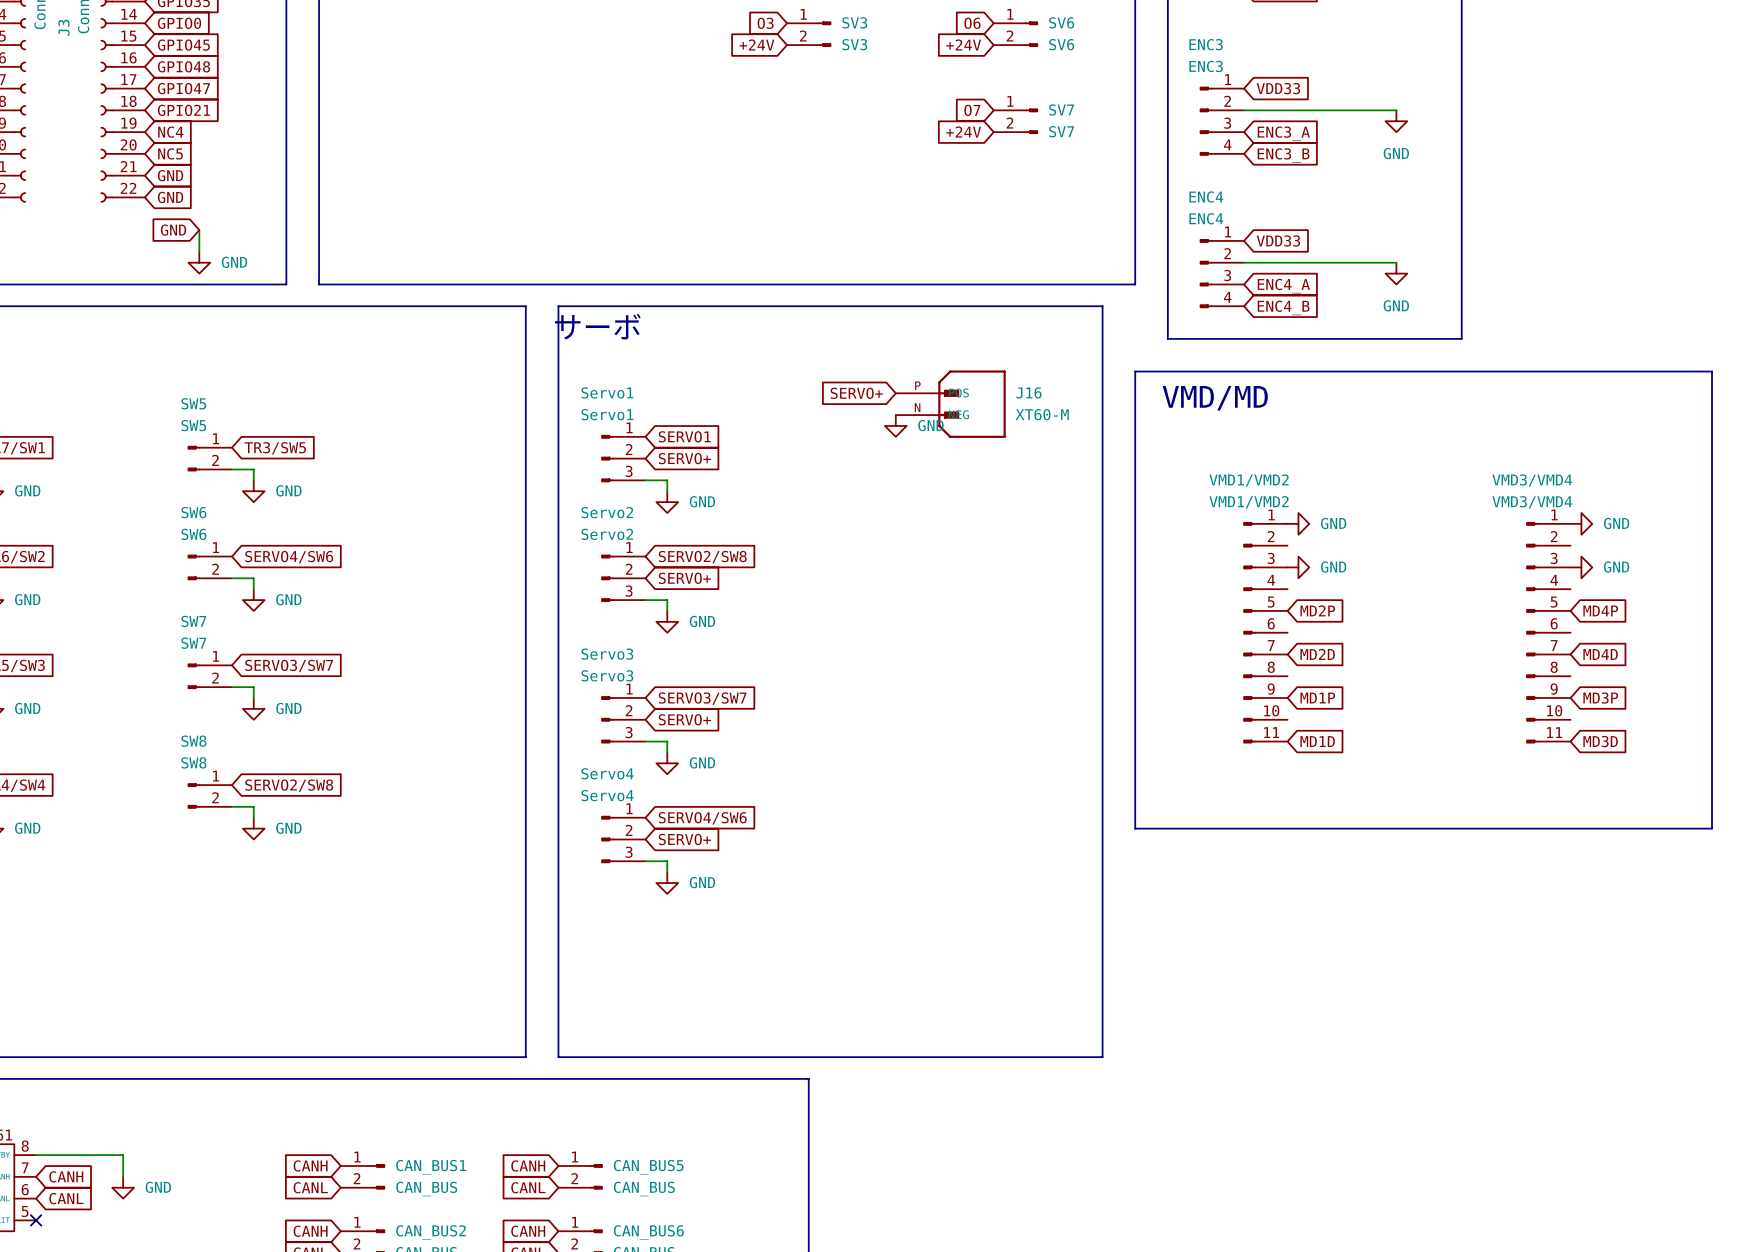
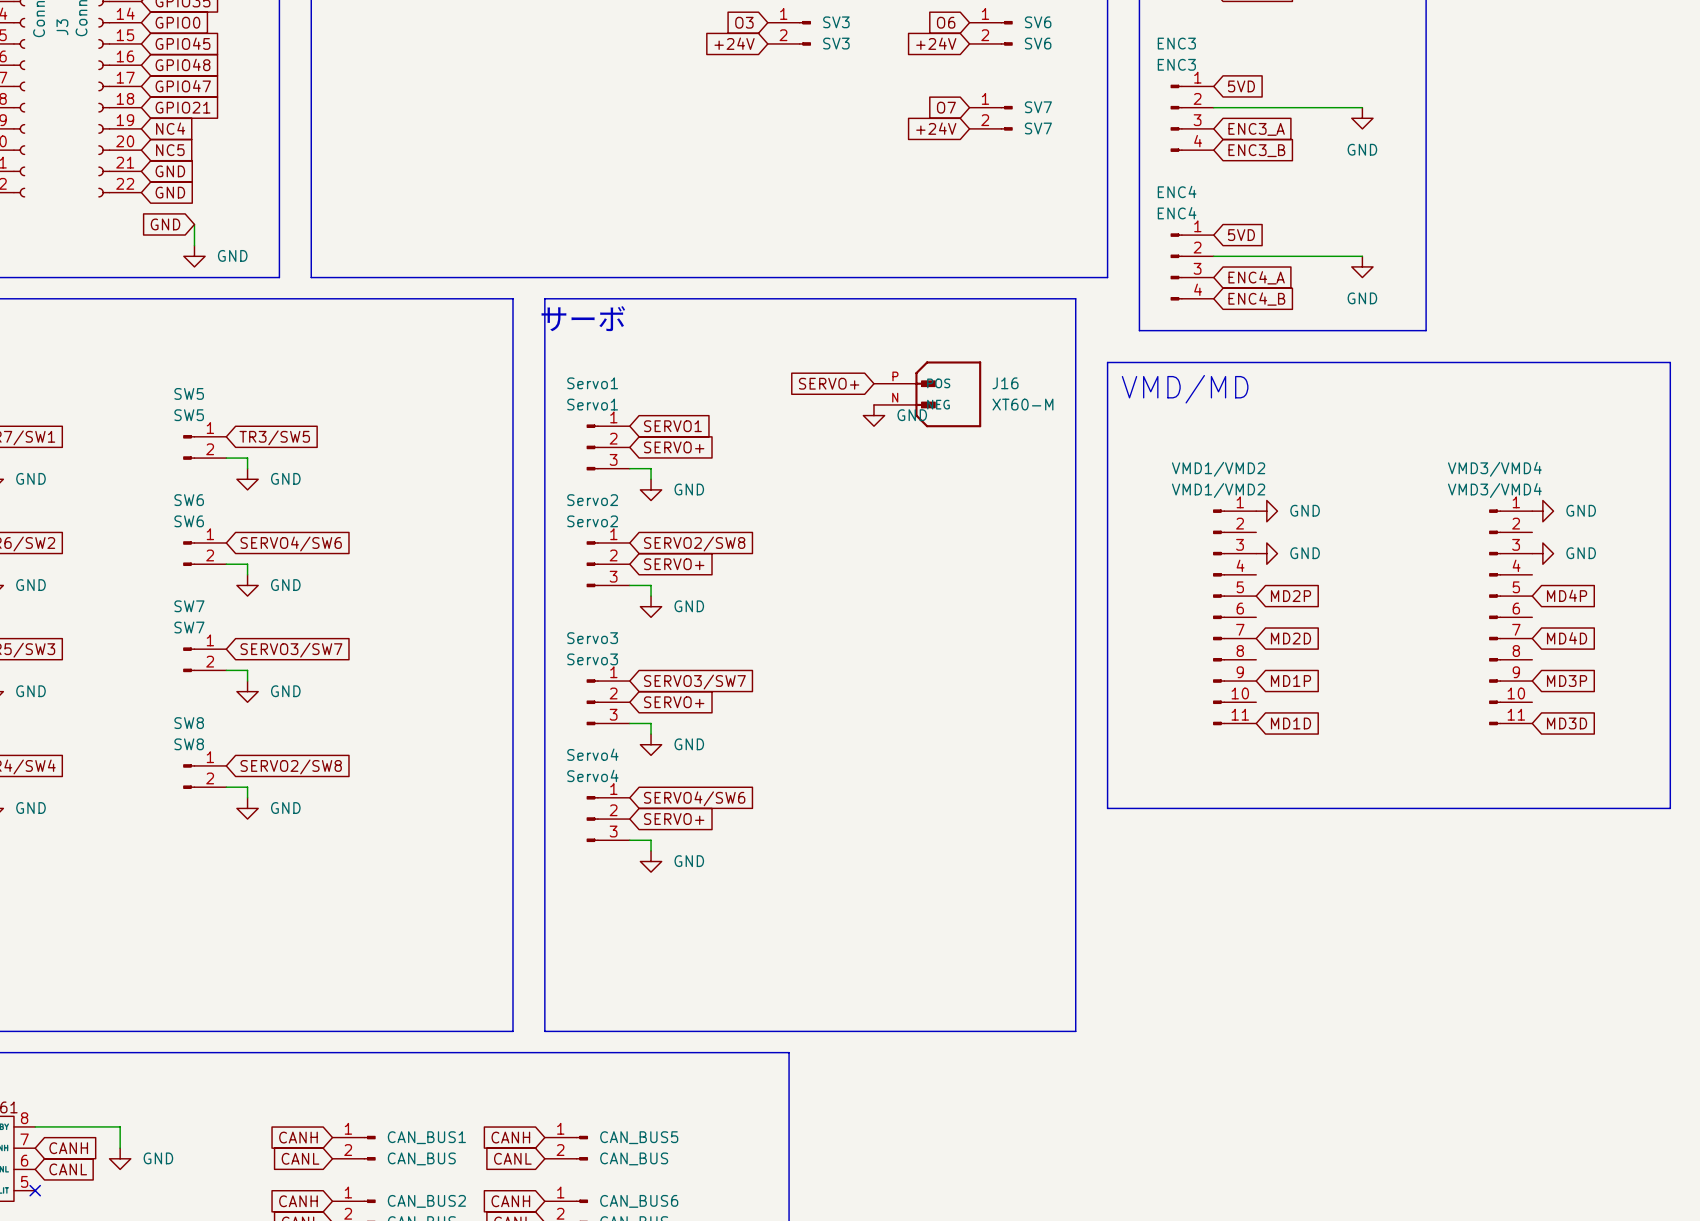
global label: VDD33 (1278, 88) -> 5VD (1241, 86)
global label: VDD33 (1278, 240) -> 5VD (1241, 235)

